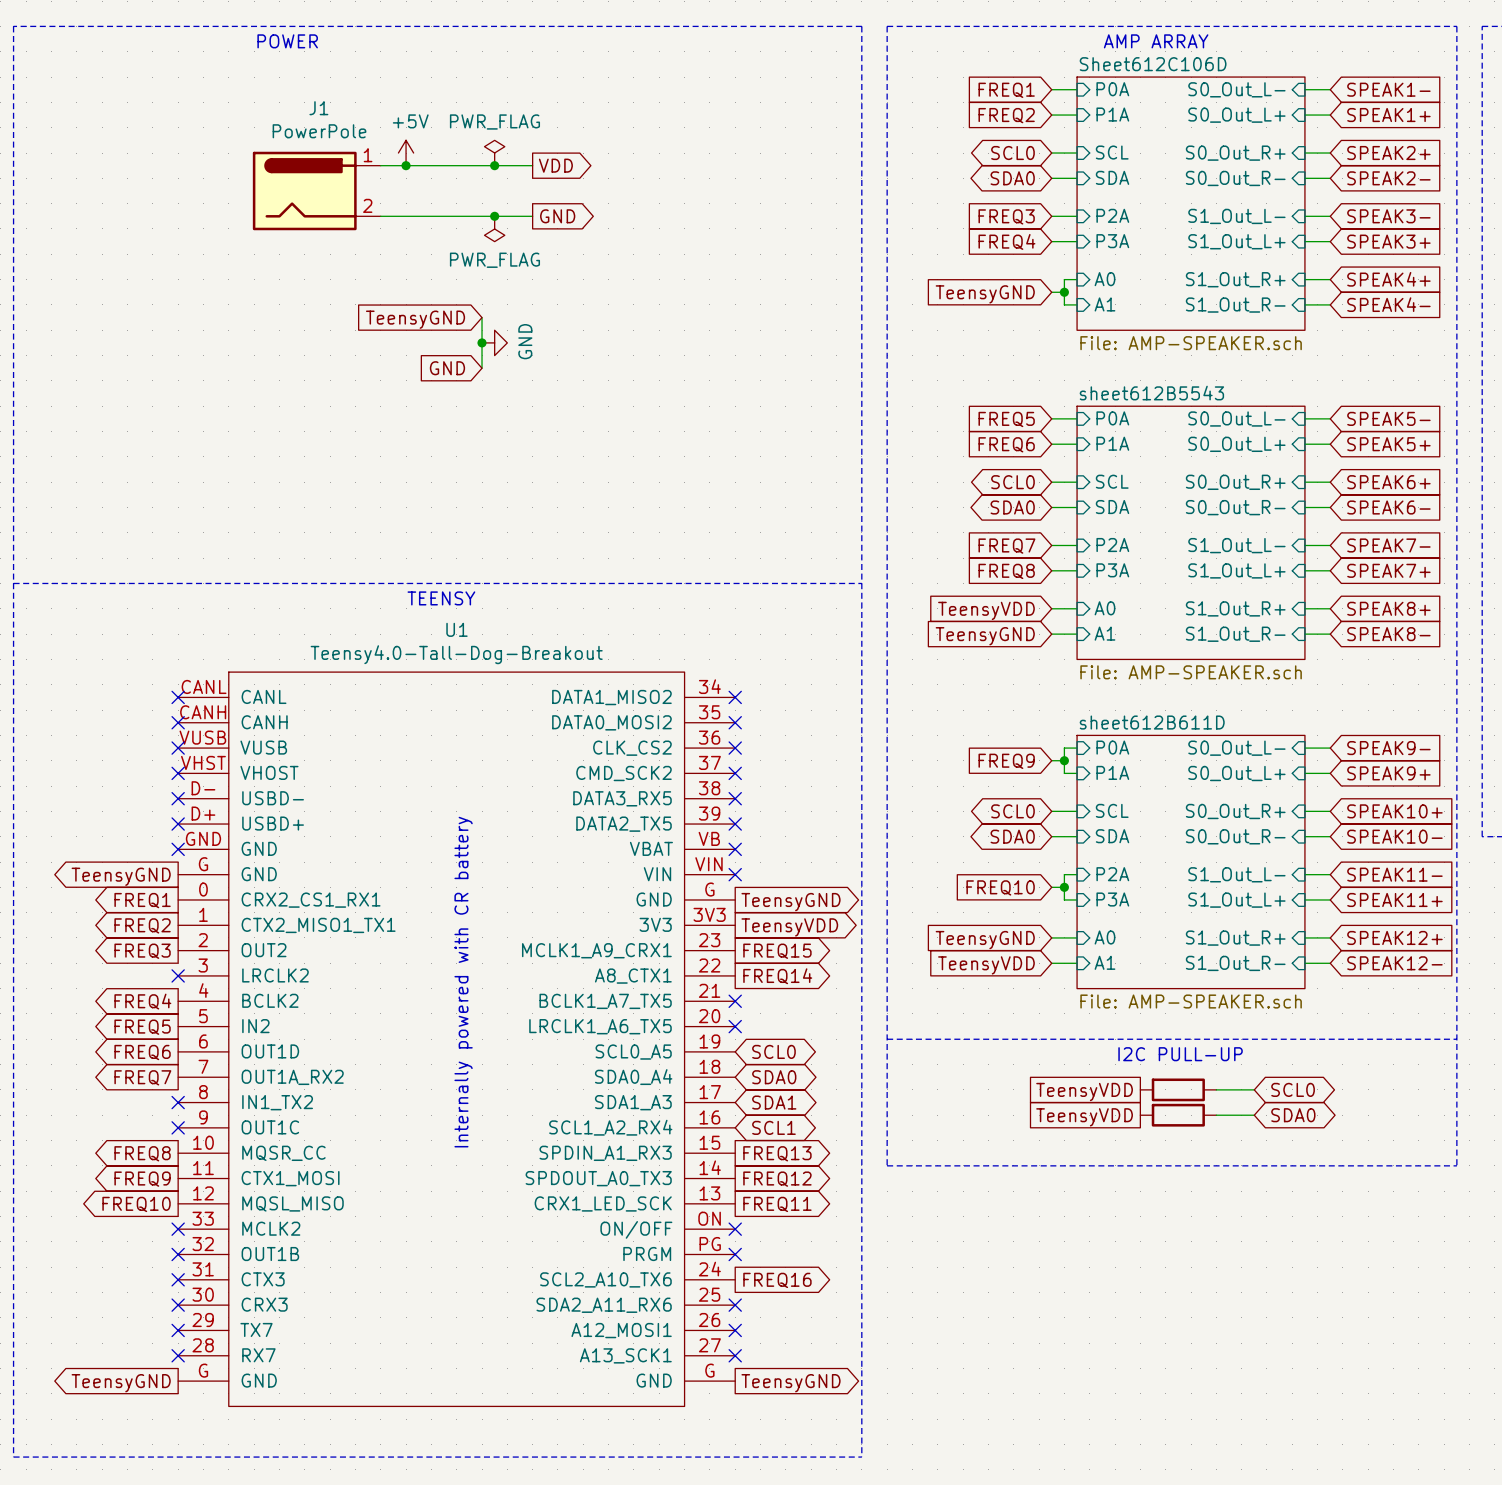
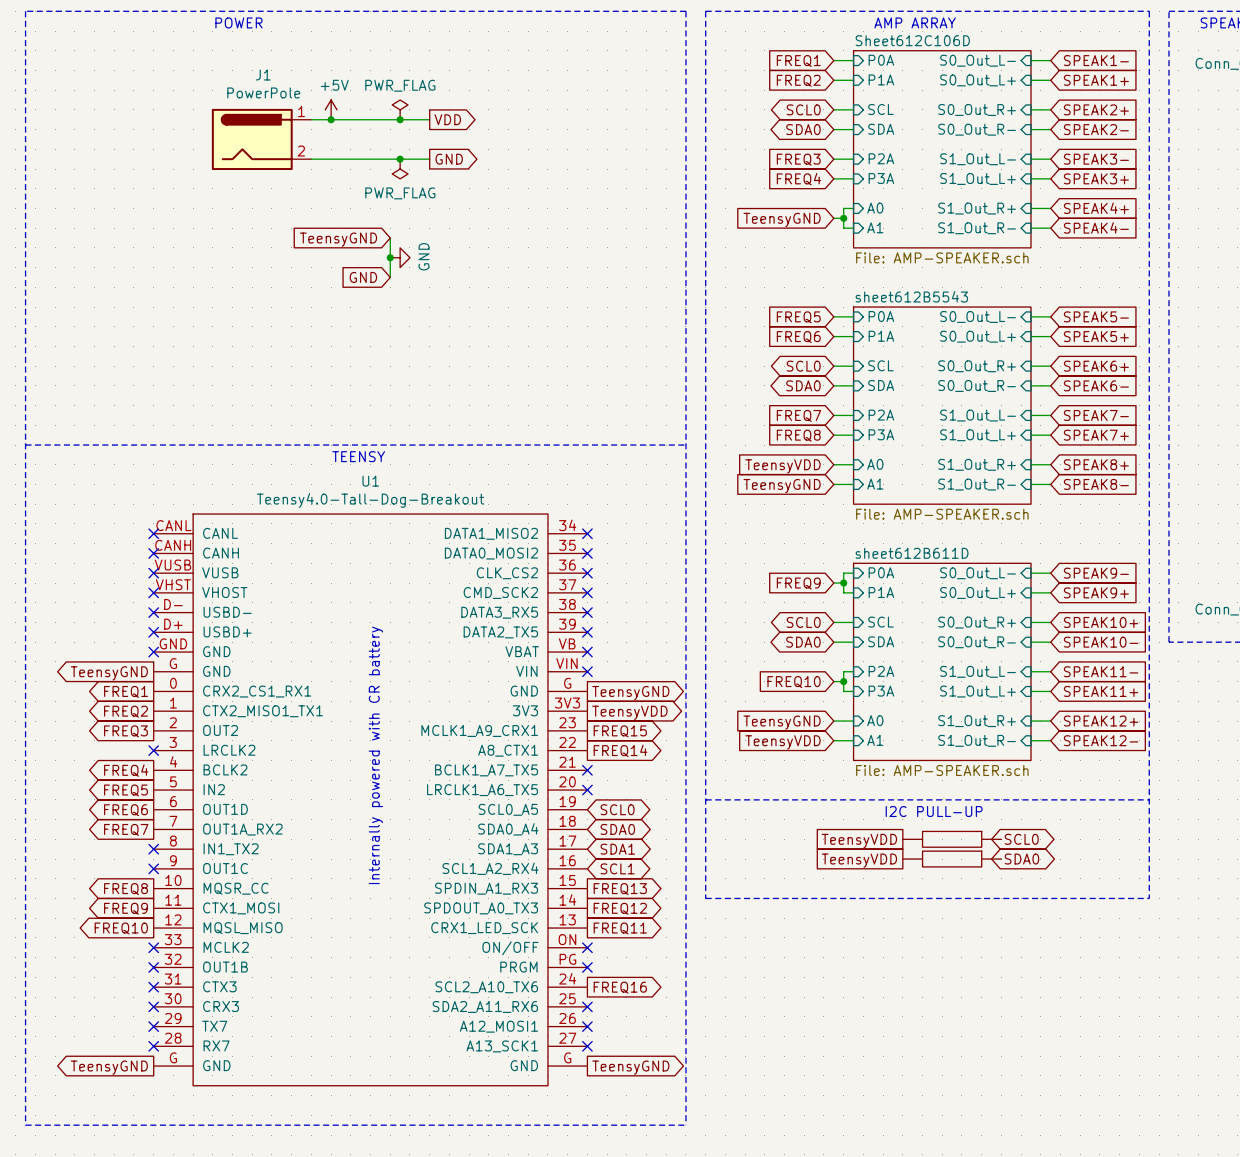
part: (1178, 1089) -> none
part: none -> (952, 839)
wire: (1216, 1089) (1254, 1089) -> none
part: (1178, 1115) -> none
part: none -> (952, 859)
wire: (1216, 1115) (1254, 1115) -> none

